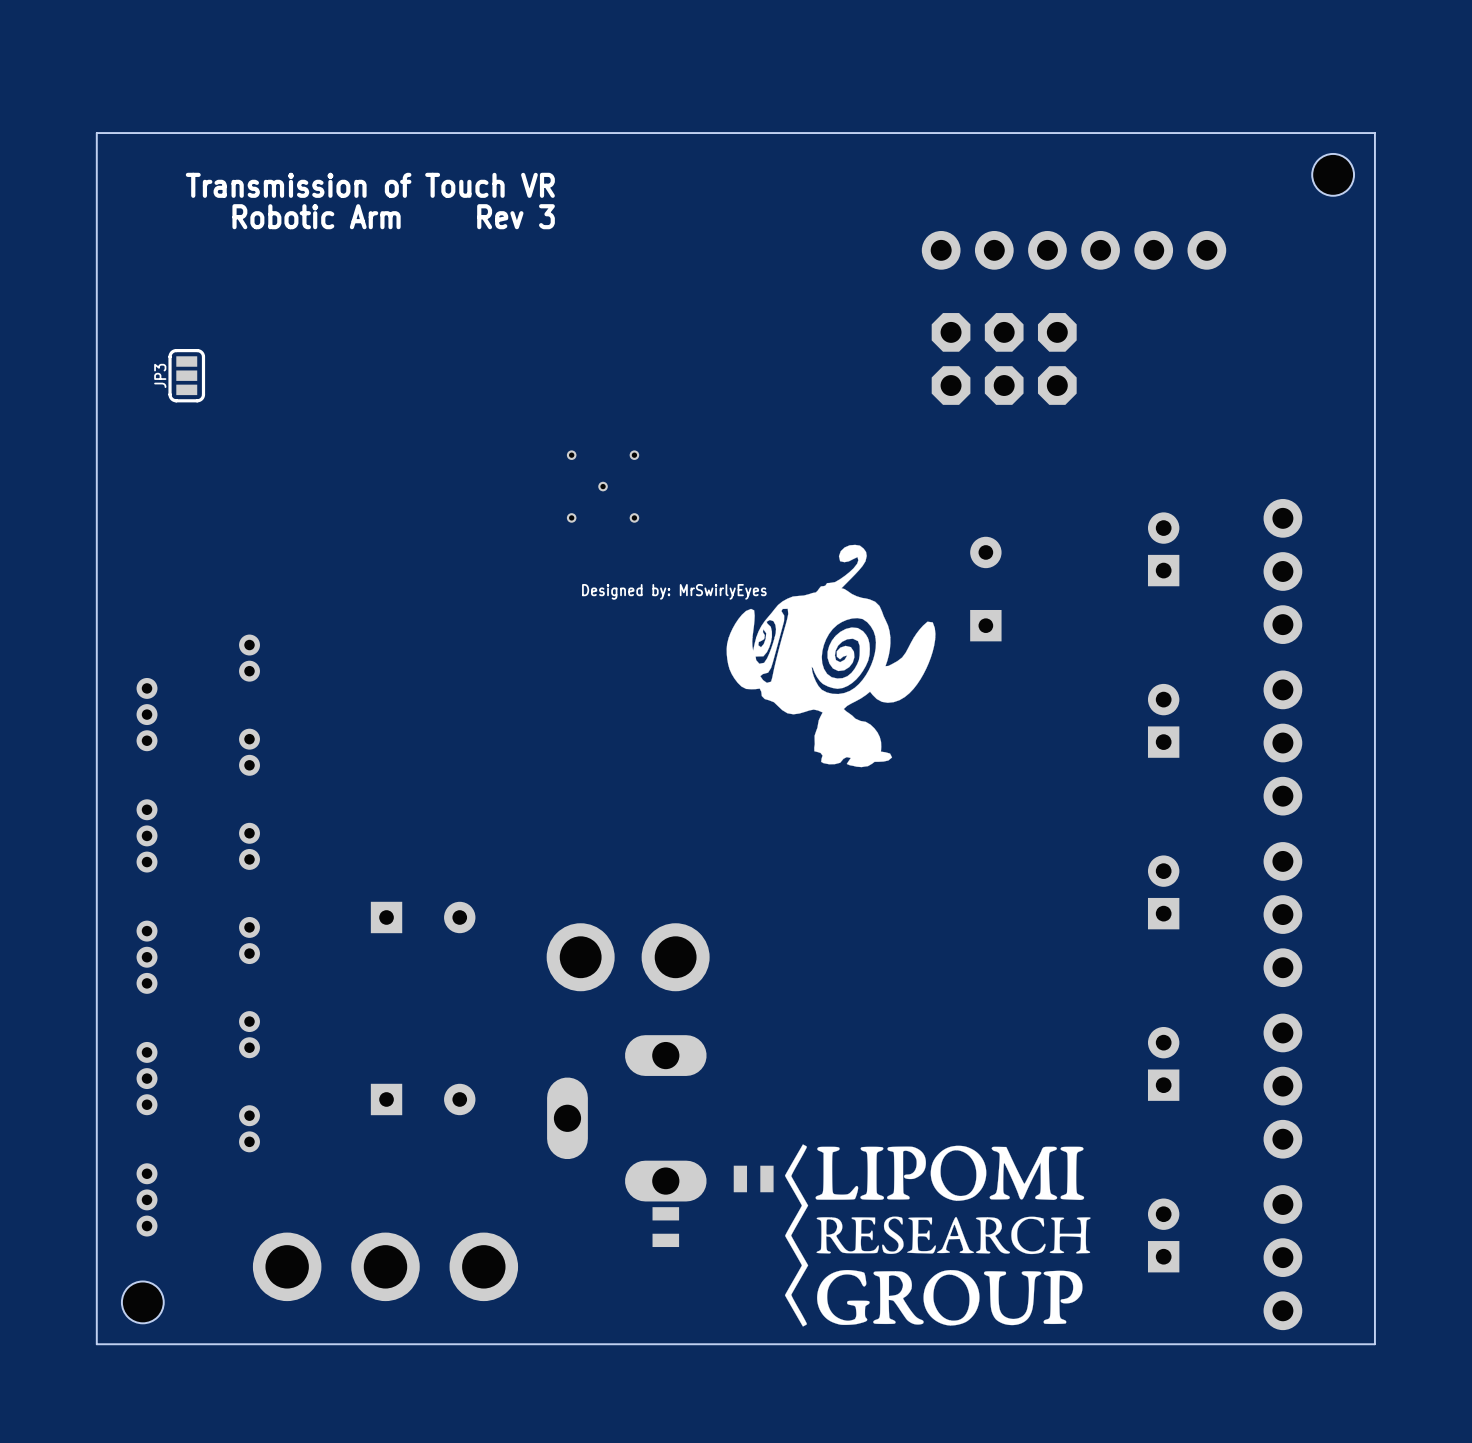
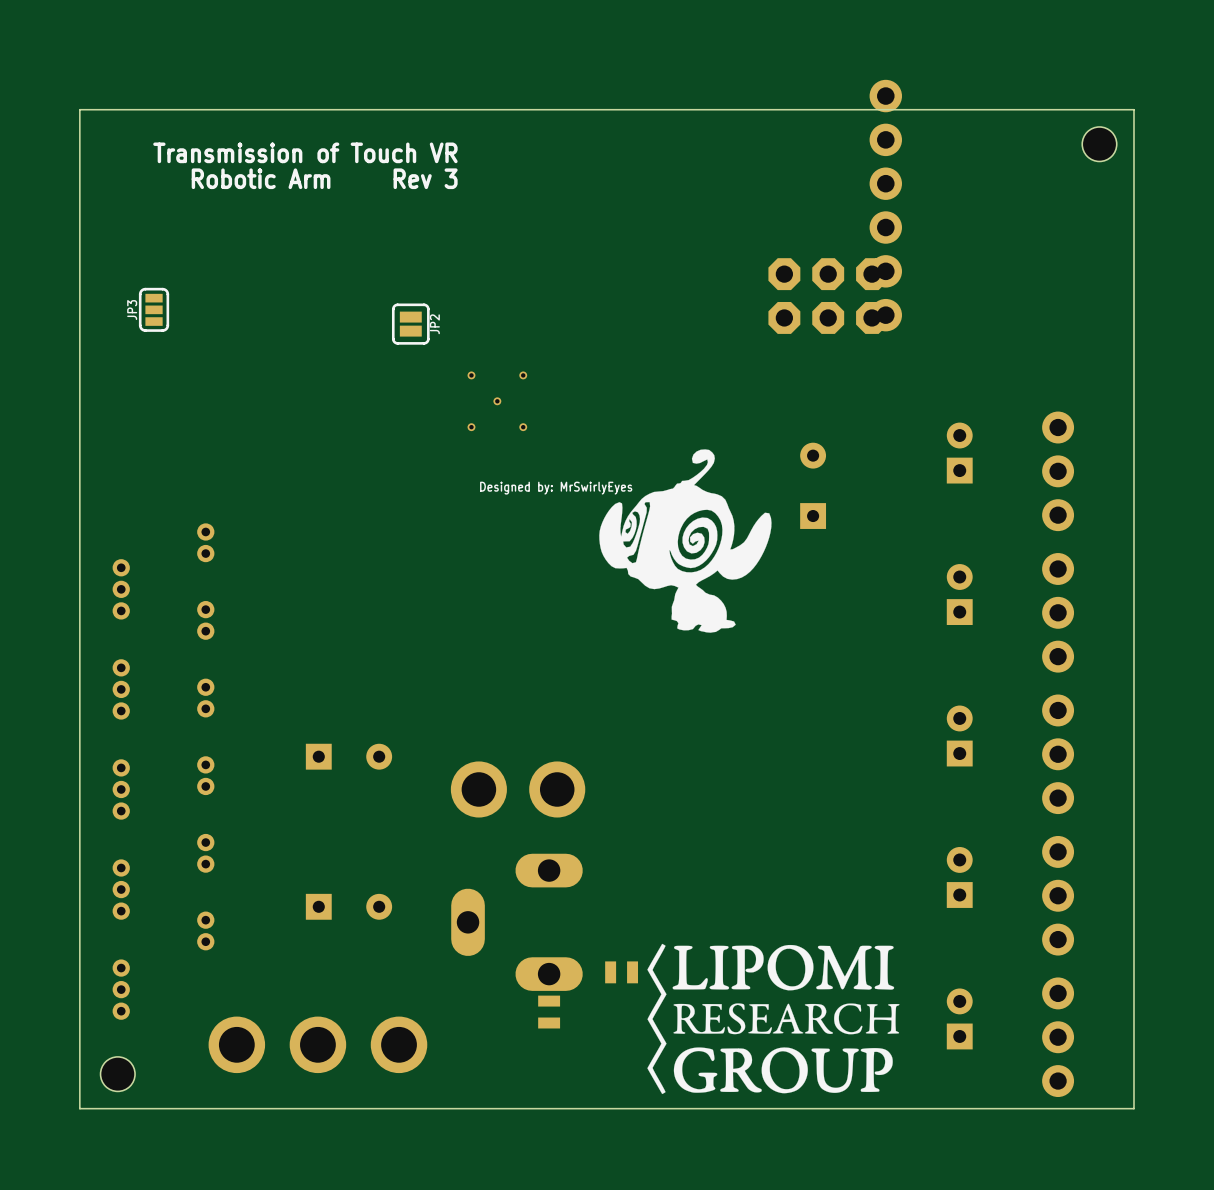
part footprint: [921, 230, 1227, 270] -> [869, 79, 903, 332]
JP2: none -> (410, 324)

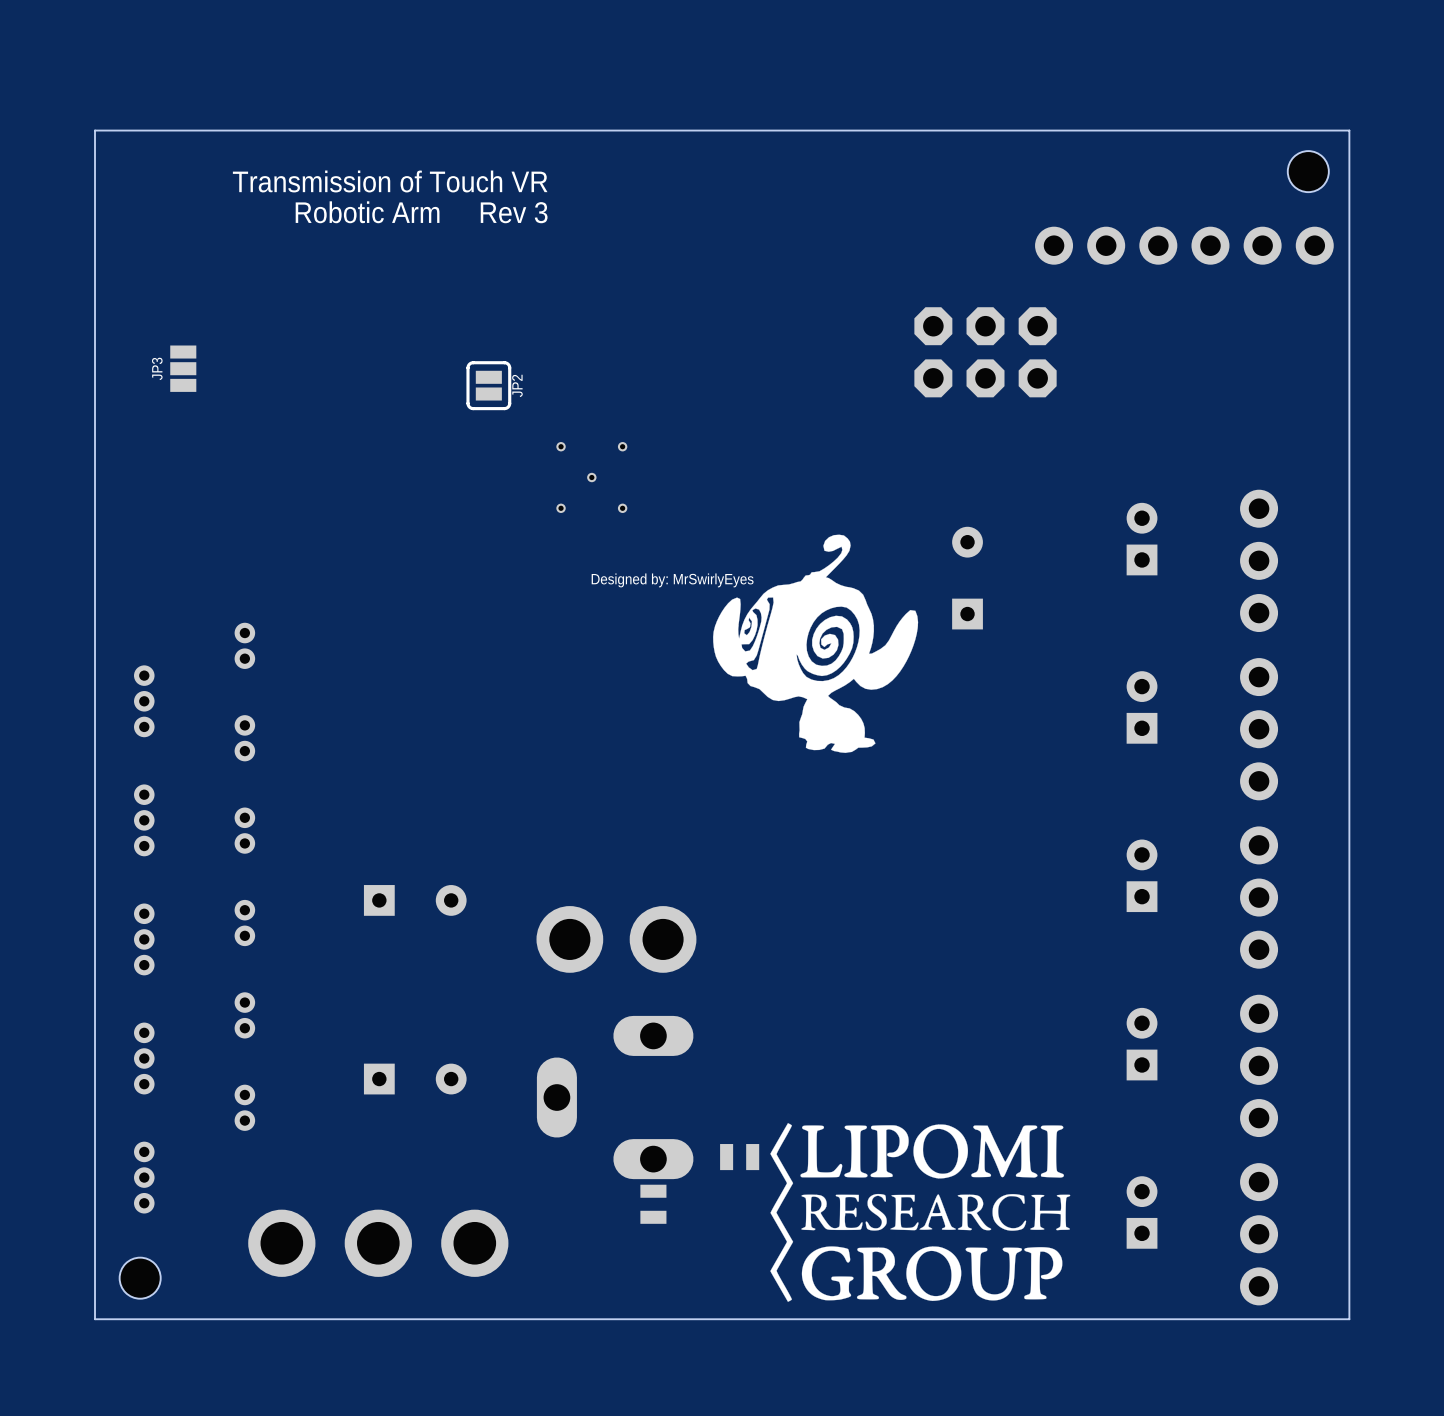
part: (885, 205) -> none
part: none -> (1184, 245)
JP3 footprint: [138, 287, 170, 332] -> [170, 345, 197, 392]

